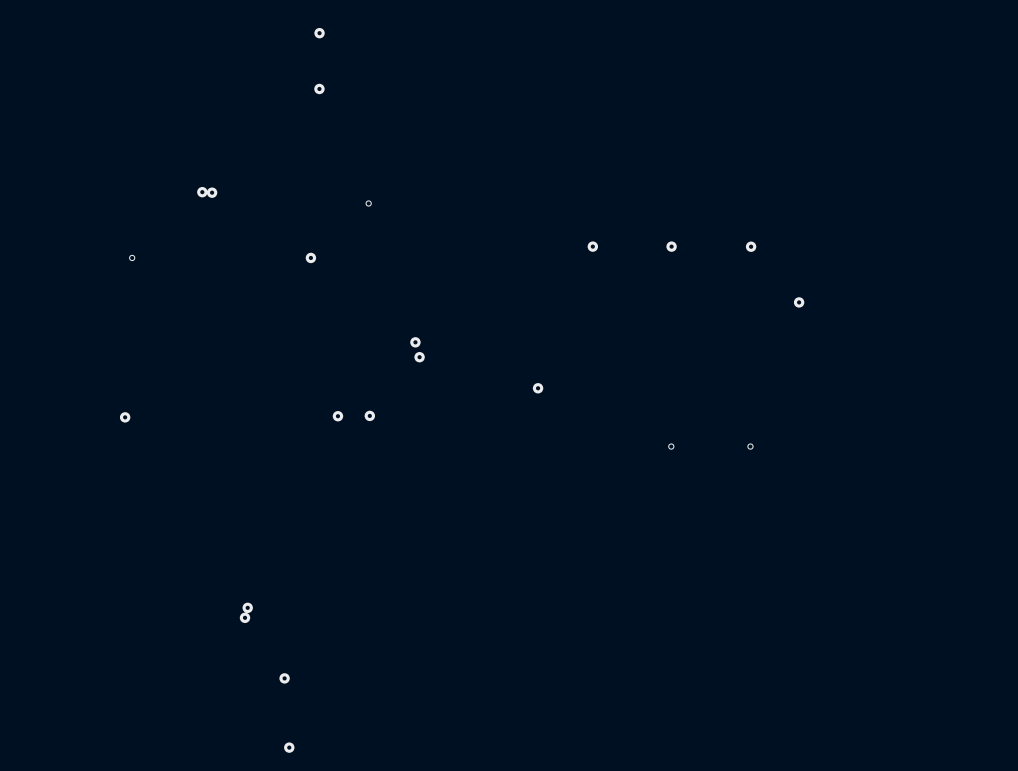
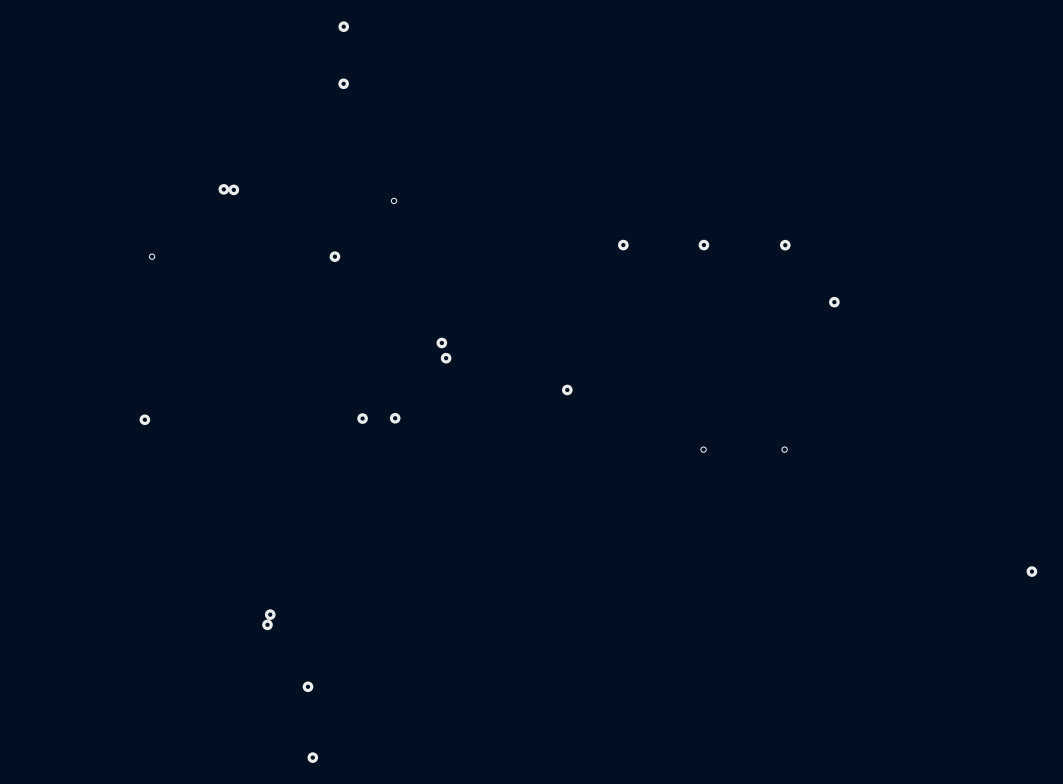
via: none -> (1031, 571)

